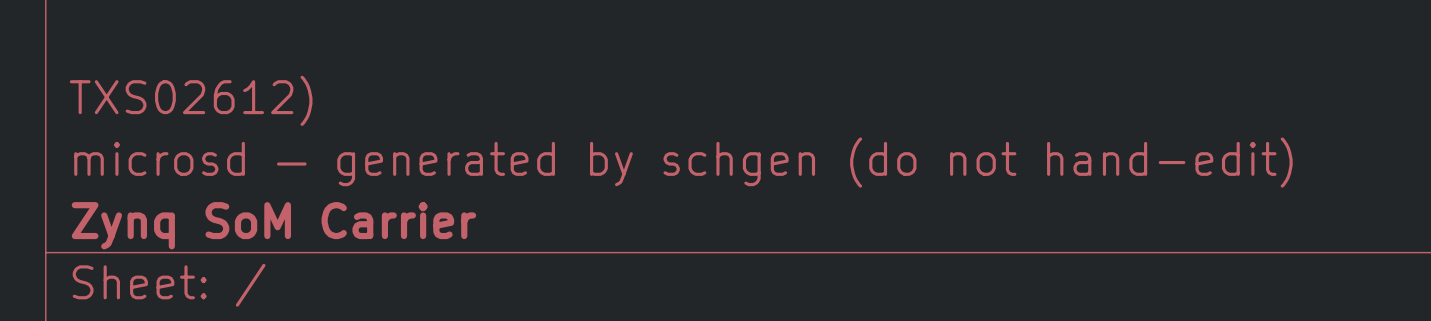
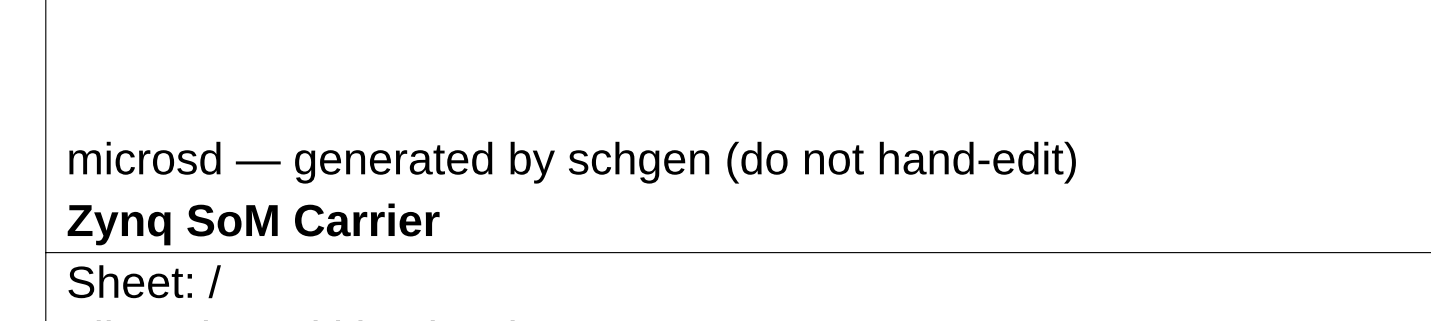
title block: TXS02612) (191, 100) -> none

